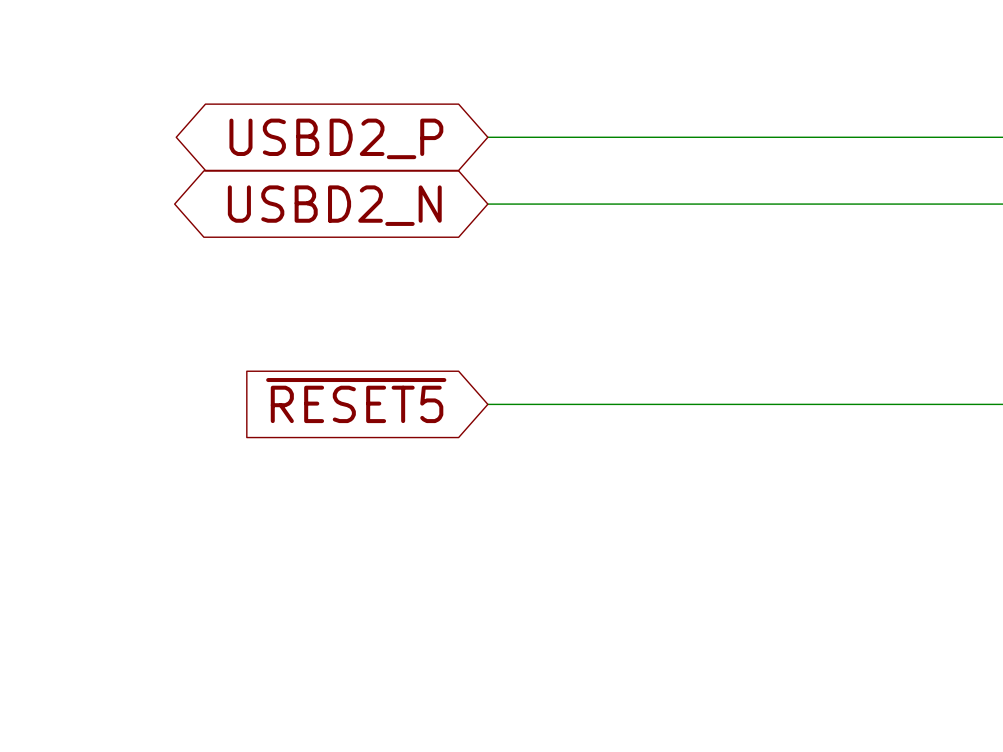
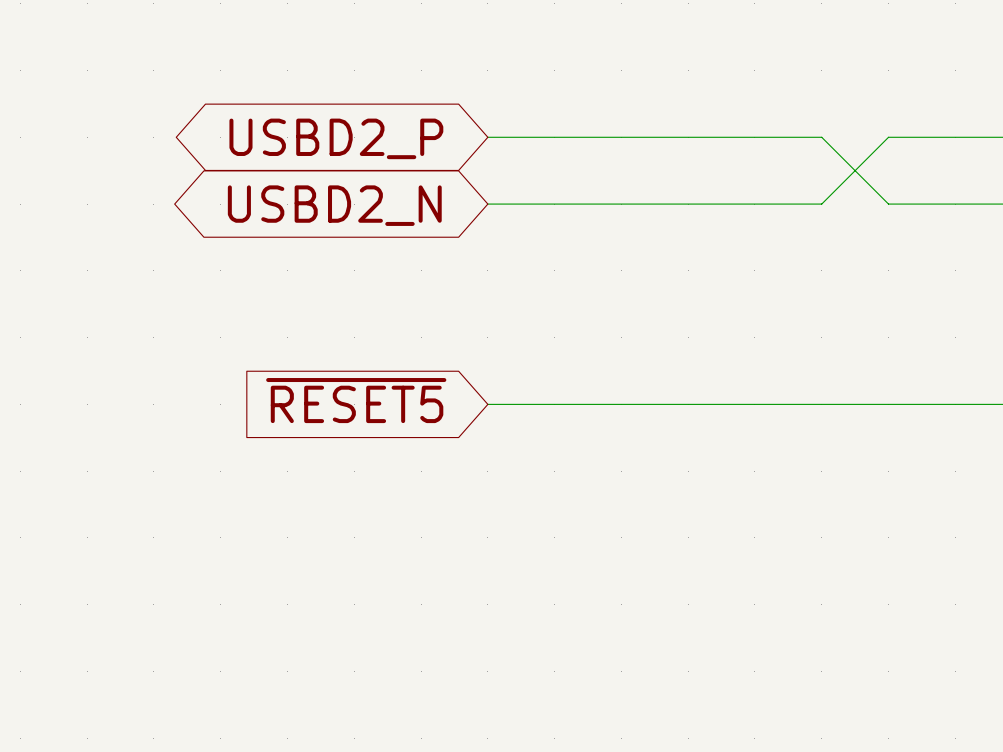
wire: (821, 137) (888, 137) -> (821, 137) (888, 204)
wire: (821, 204) (888, 204) -> (821, 204) (888, 137)

